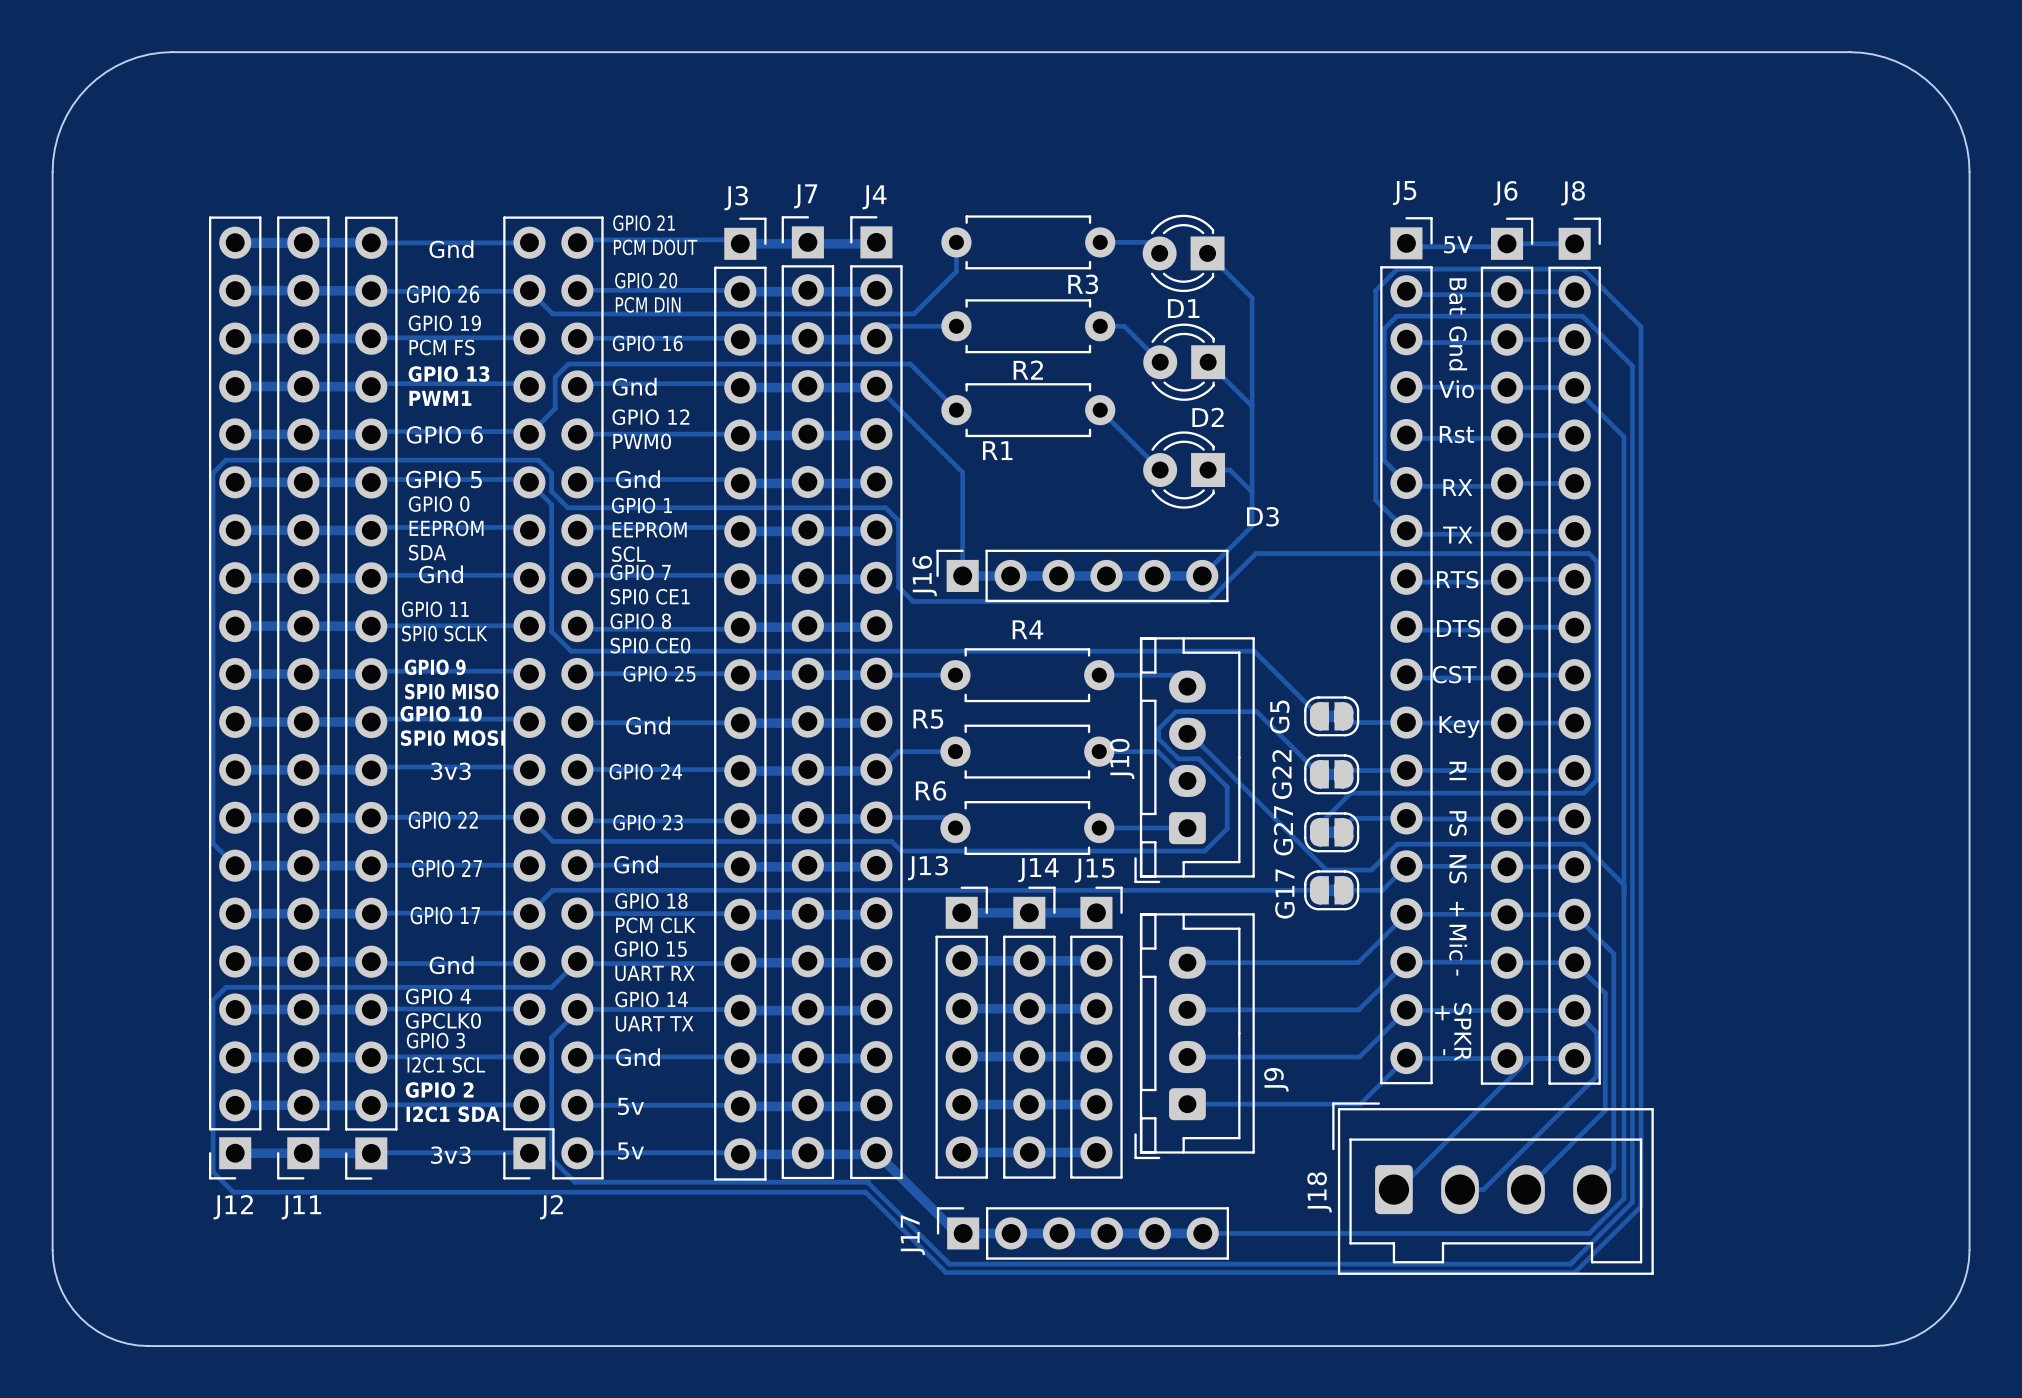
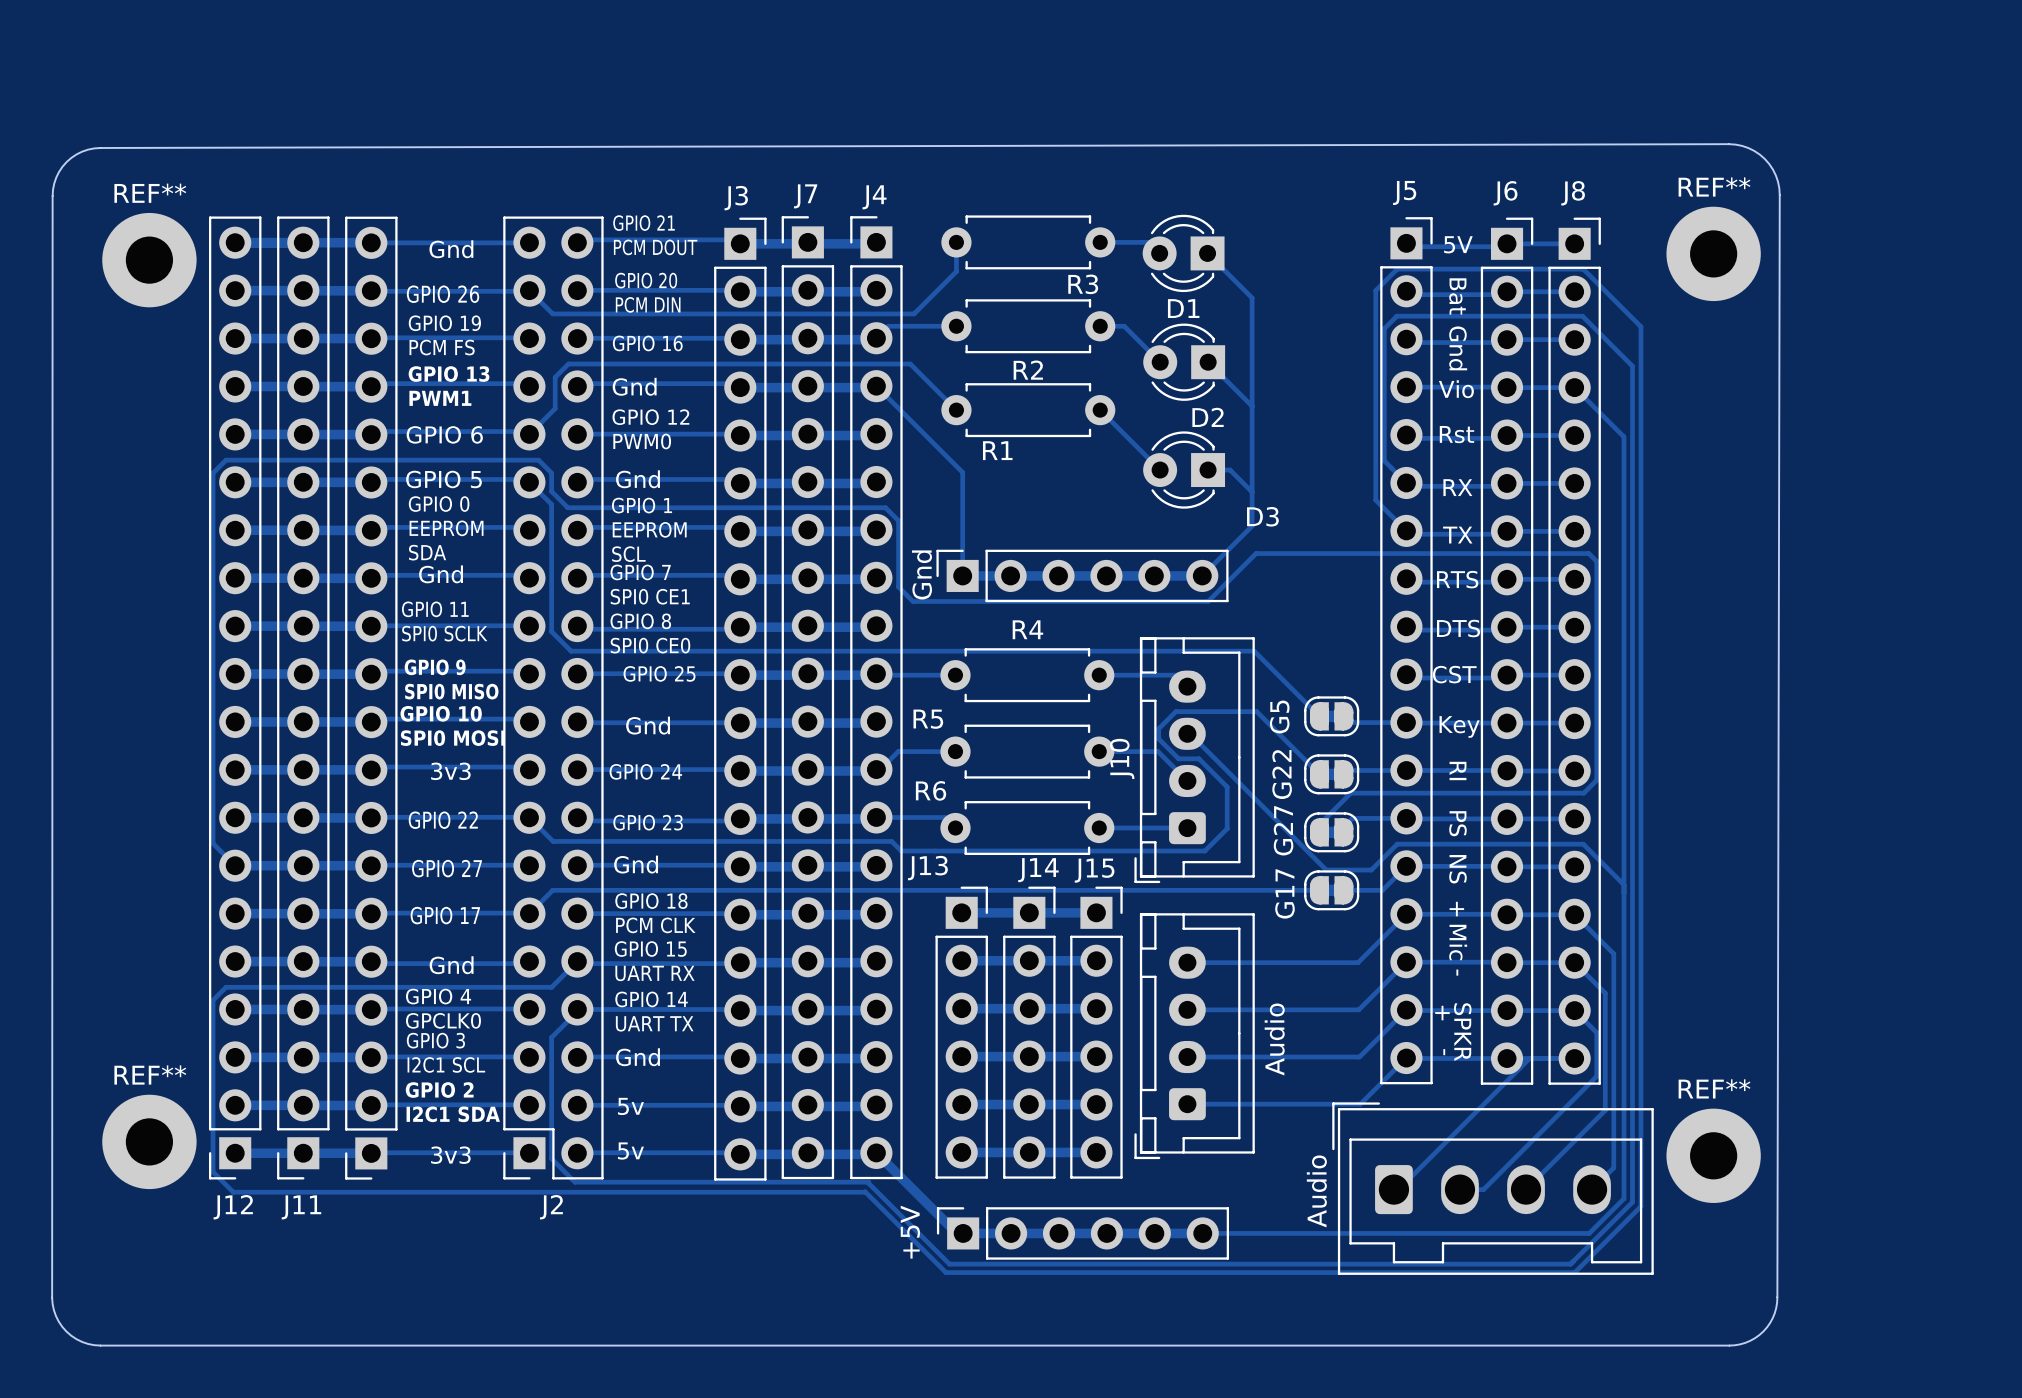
board edge: (172, 52) (1849, 52) (1884, 57) (1916, 72) (1942, 95) (1955, 115) (1964, 137) (1969, 171) (1969, 1250) (1967, 1271) (1954, 1301) (1941, 1317) (1915, 1336) (1895, 1343) (1873, 1346) (148, 1346) (127, 1343) (97, 1331) (80, 1317) (67, 1301) (58, 1281) (52, 1250) (53, 160) (57, 137) (66, 115) (79, 95) (96, 79) (115, 66) (137, 57) (172, 52) -> (1728, 144) (100, 147) (82, 151) (71, 157) (62, 166) (56, 177) (52, 195) (52, 1297) (55, 1316) (62, 1326) (71, 1335) (82, 1341) (100, 1345) (1729, 1345) (1745, 1342) (1755, 1338) (1767, 1327) (1772, 1318) (1777, 1297) (1779, 194) (1775, 175) (1764, 159) (1748, 148) (1728, 144)
REF**: none -> (1713, 253)
REF**: none -> (149, 260)
J16 name: J16 (924, 575) -> Gnd (921, 574)
J9 name: J9 (1276, 1079) -> Audio (1274, 1039)
REF**: none -> (149, 1141)
REF**: none -> (1713, 1155)
J18 name: J18 (1319, 1192) -> Audio (1316, 1191)
J17 name: J17 (912, 1235) -> +5V (910, 1232)

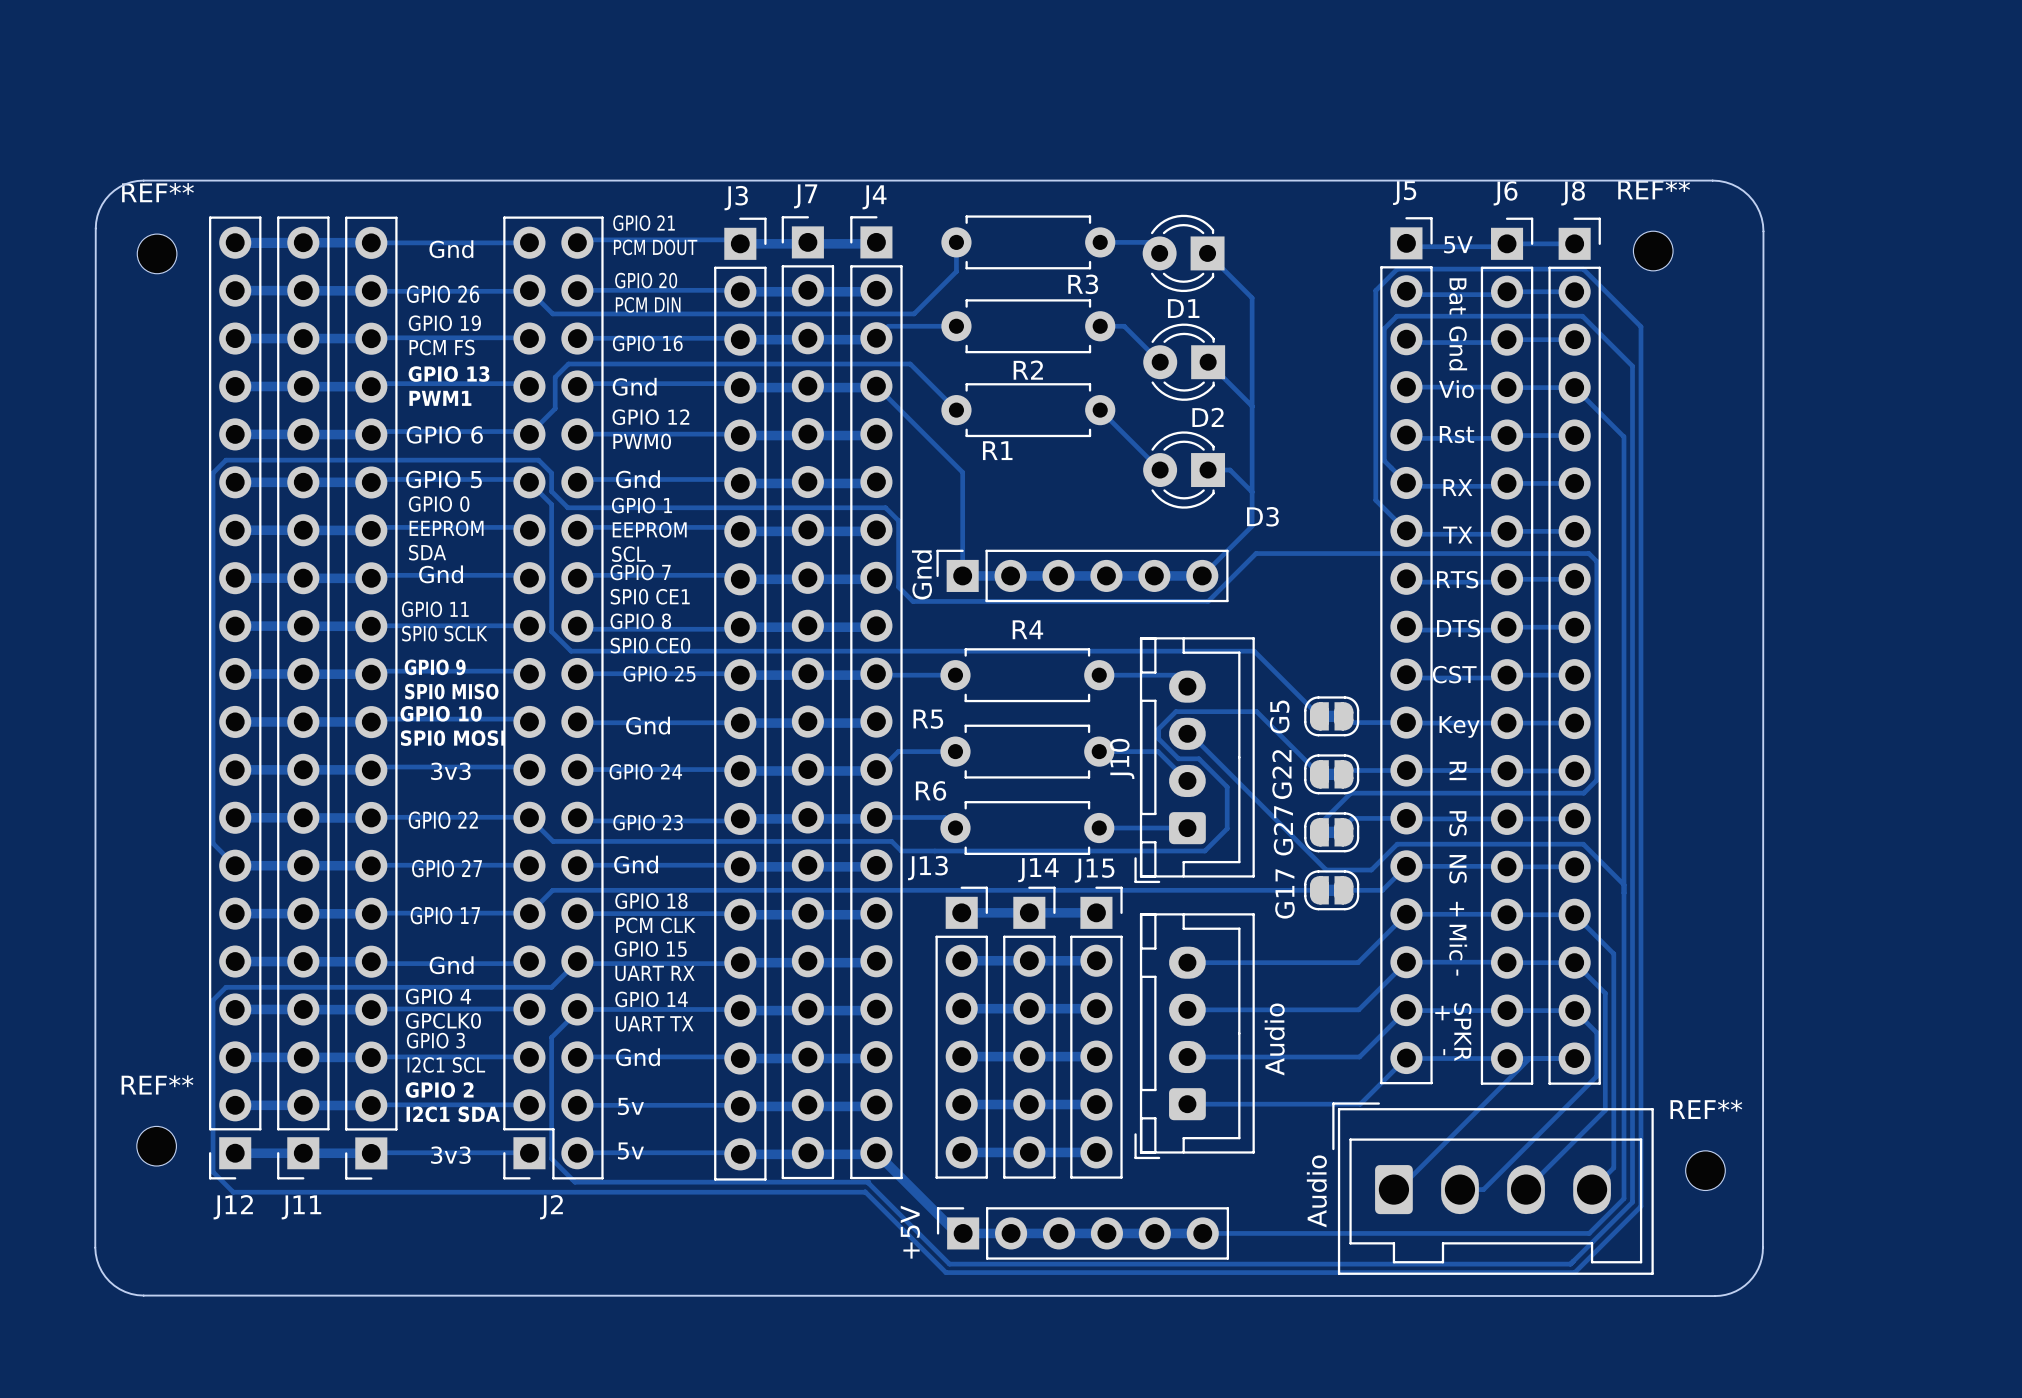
board edge: (1728, 144) (100, 147) (82, 151) (71, 157) (62, 166) (56, 177) (52, 195) (52, 1297) (55, 1316) (62, 1326) (71, 1335) (82, 1341) (100, 1345) (1729, 1345) (1745, 1342) (1755, 1338) (1767, 1327) (1772, 1318) (1777, 1297) (1779, 194) (1775, 175) (1764, 159) (1748, 148) (1728, 144) -> (143, 180) (125, 184) (109, 194) (99, 210) (95, 228) (95, 1247) (97, 1260) (101, 1271) (114, 1285) (131, 1293) (143, 1295) (1715, 1296) (1730, 1293) (1740, 1288) (1755, 1273) (1761, 1258) (1762, 1247) (1763, 231) (1759, 211) (1752, 200) (1743, 191) (1732, 184) (1712, 180) (143, 180)
REF** footprint: [102, 212, 197, 308] -> [137, 234, 177, 274]
REF**: none -> (1653, 251)
REF**: (1713, 253) -> none
REF** footprint: [102, 1094, 197, 1190] -> [136, 1126, 177, 1167]
REF** footprint: [1666, 1108, 1761, 1203] -> [1685, 1150, 1726, 1191]

